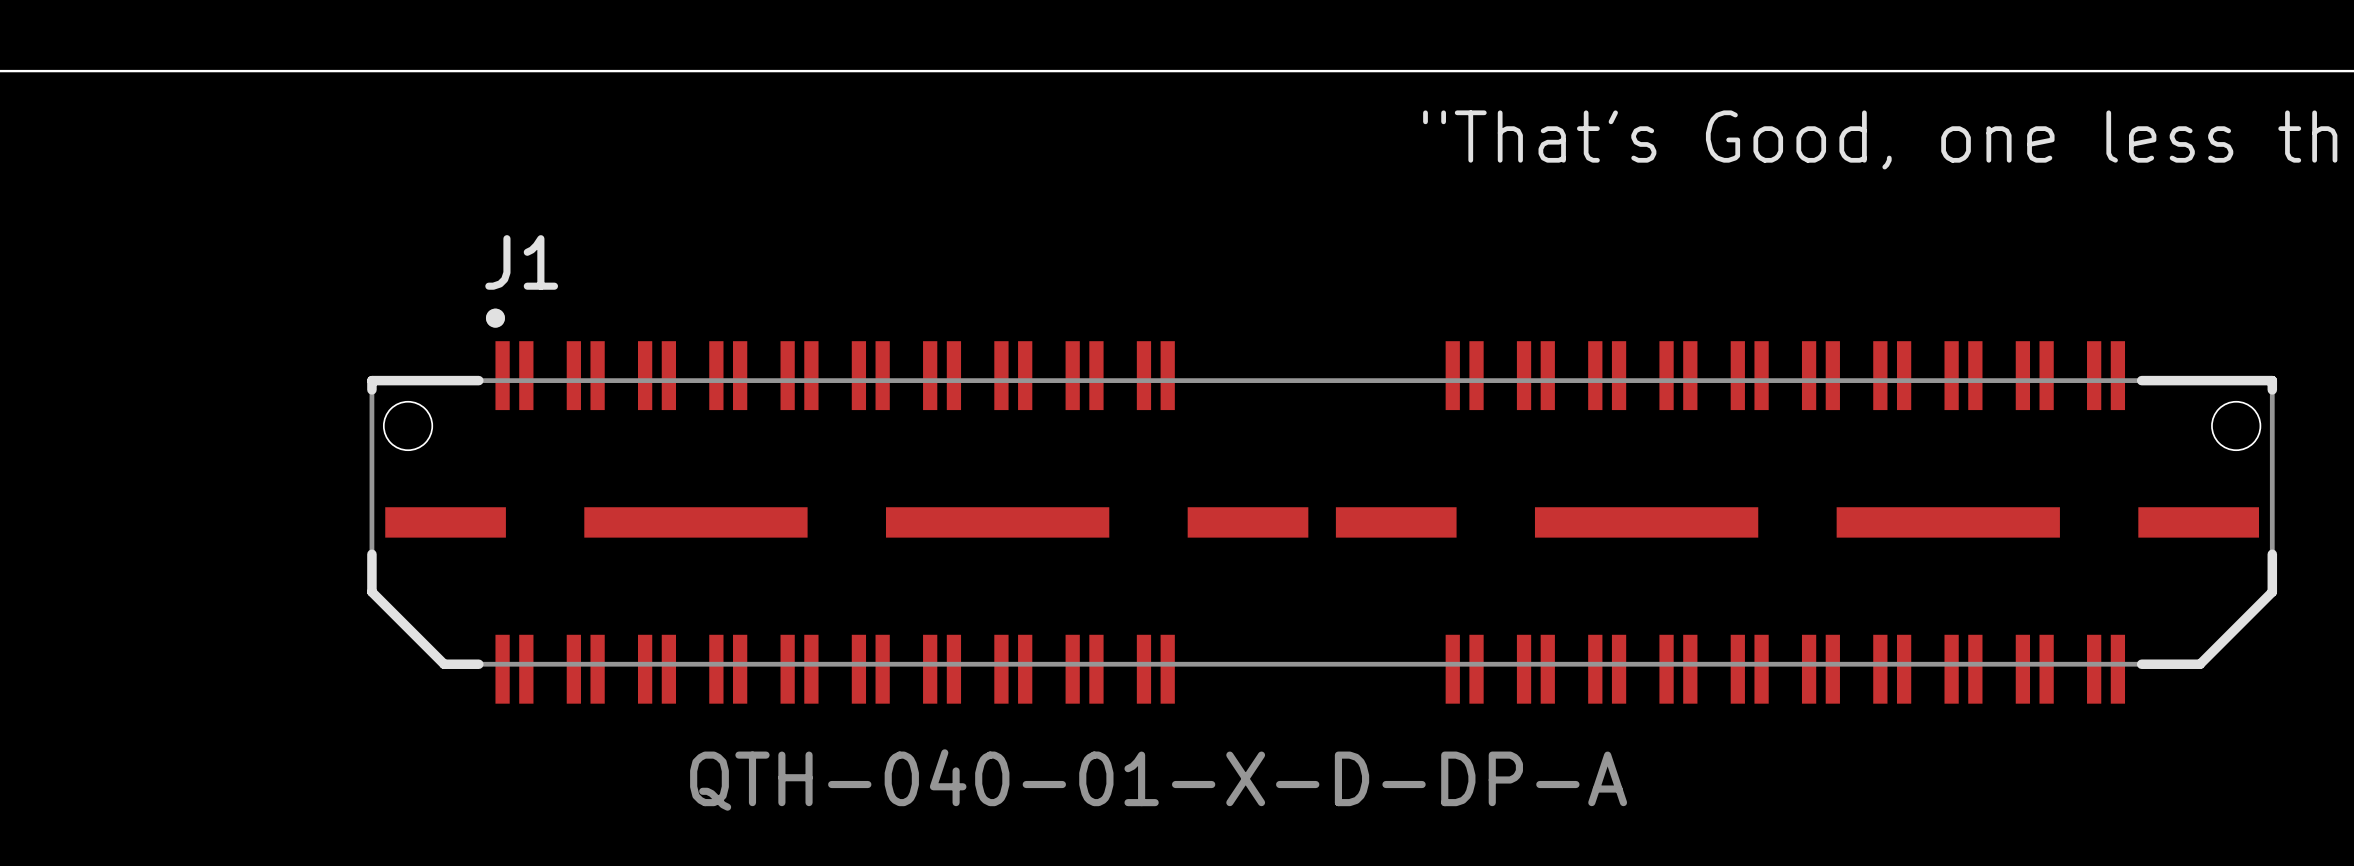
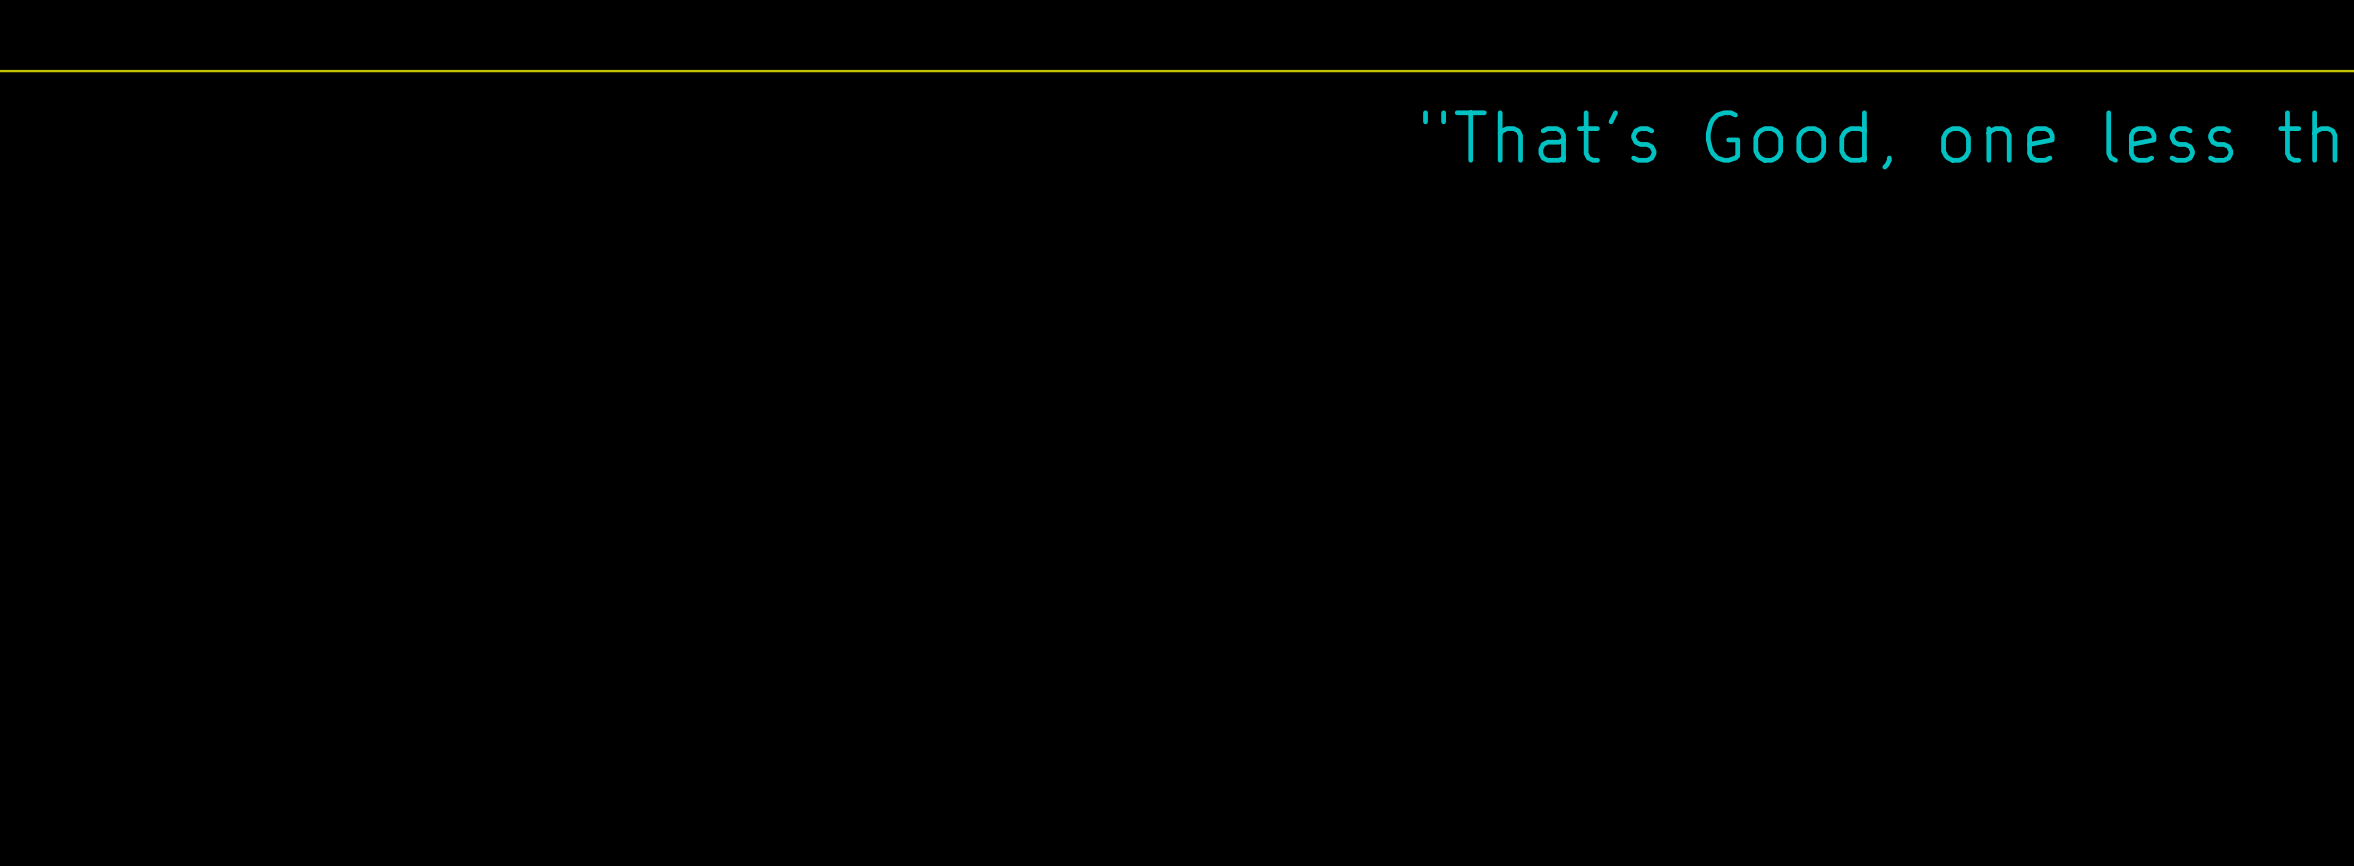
J1: QTH-040-01-X-D-DP-A (1322, 506) -> none

